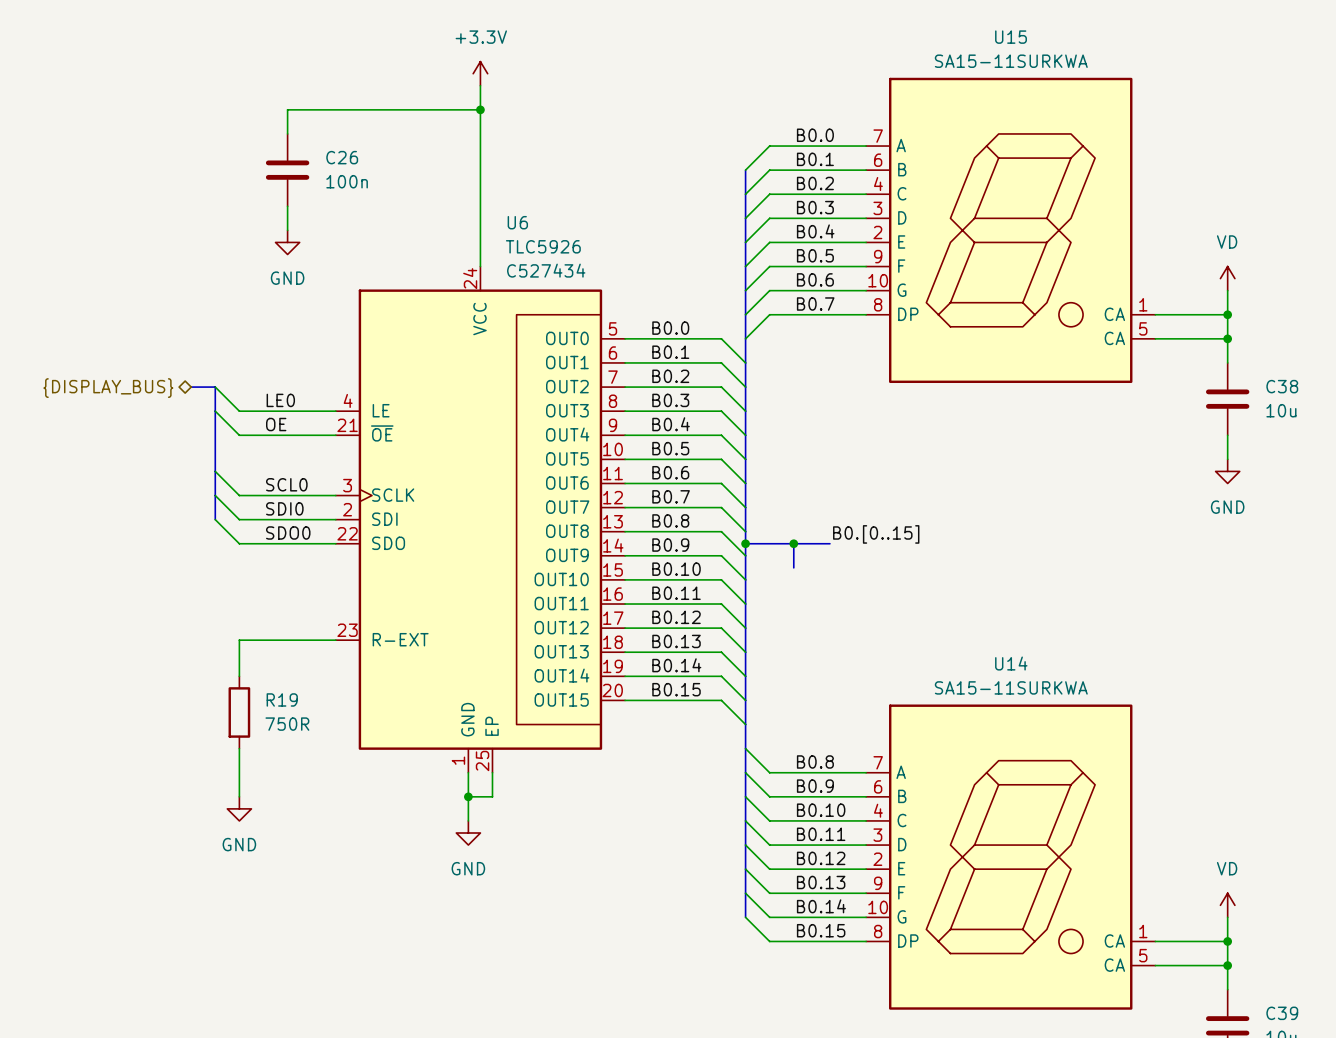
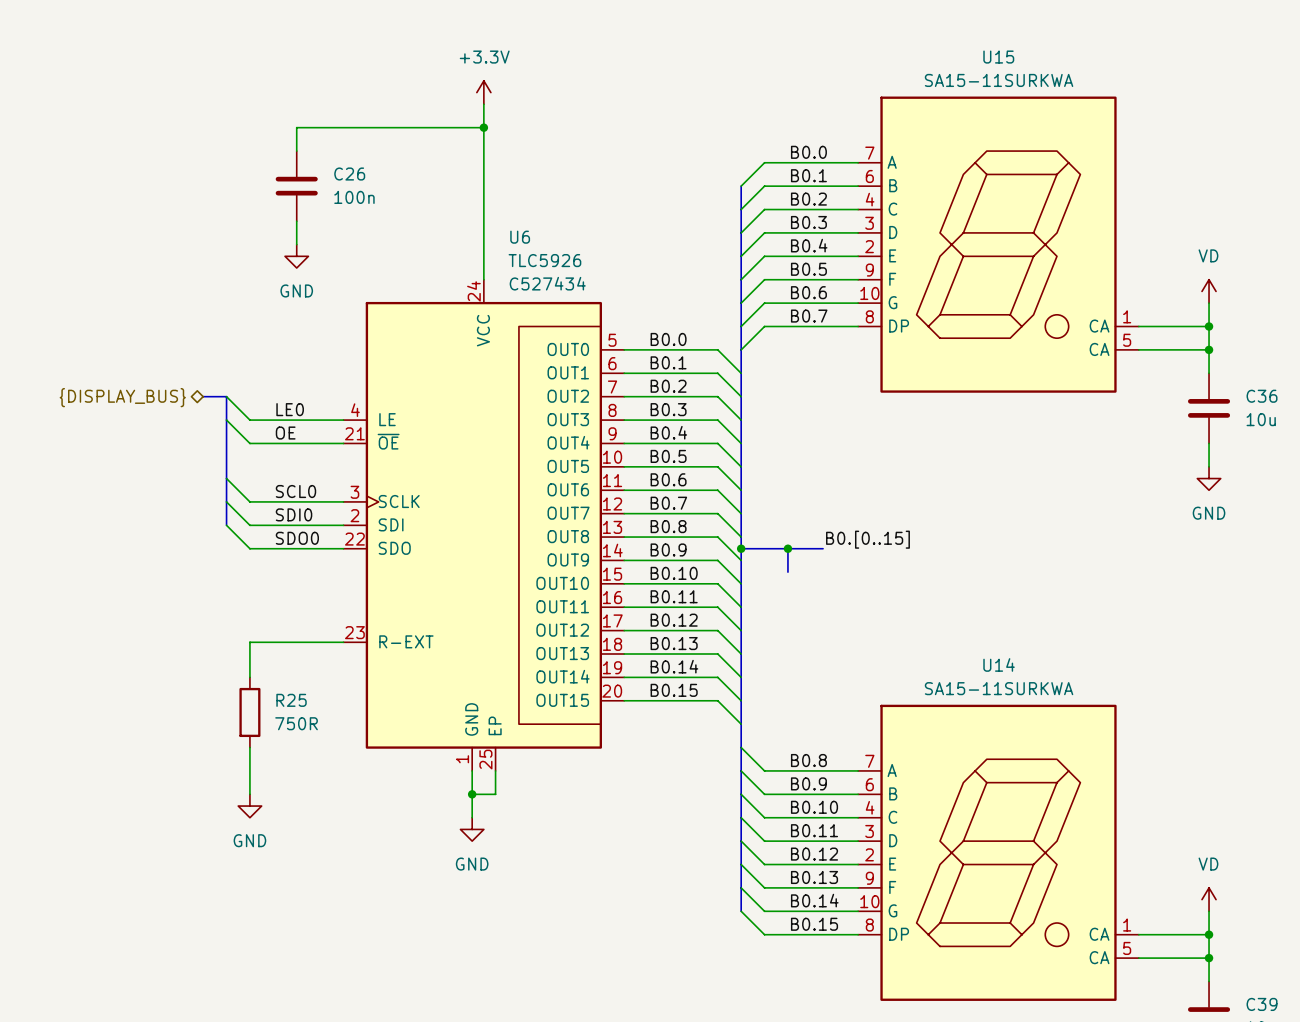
C38 name: C38 (1282, 386) -> C36 (1262, 396)
R19 name: R19 (282, 699) -> R25 (291, 700)

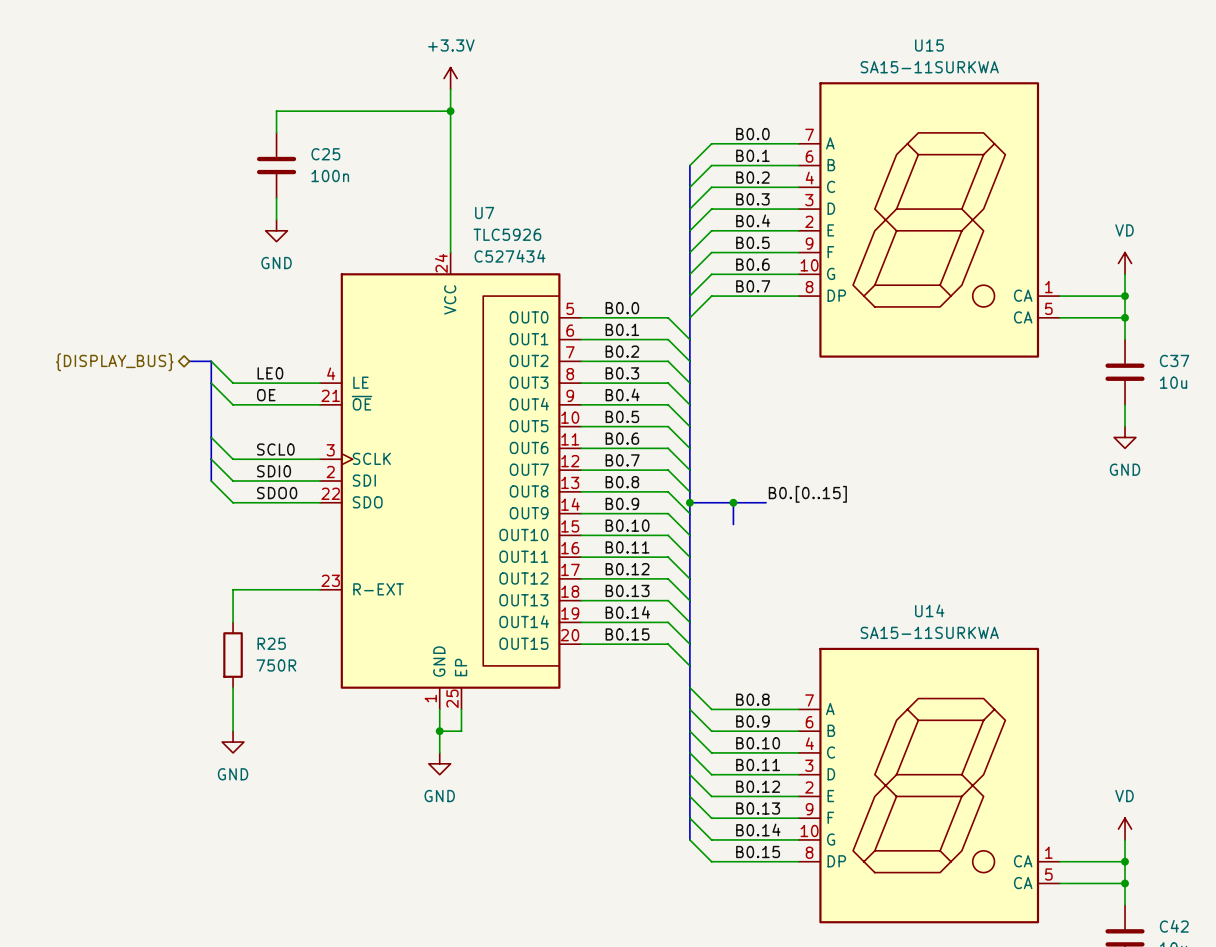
C26 name: C26 (349, 174) -> C25 (325, 154)
U6 name: U6 (520, 237) -> U7 (484, 213)
C36 name: C36 (1262, 396) -> C37 (1174, 360)
C39 name: C39 (1262, 1004) -> C42 (1174, 926)

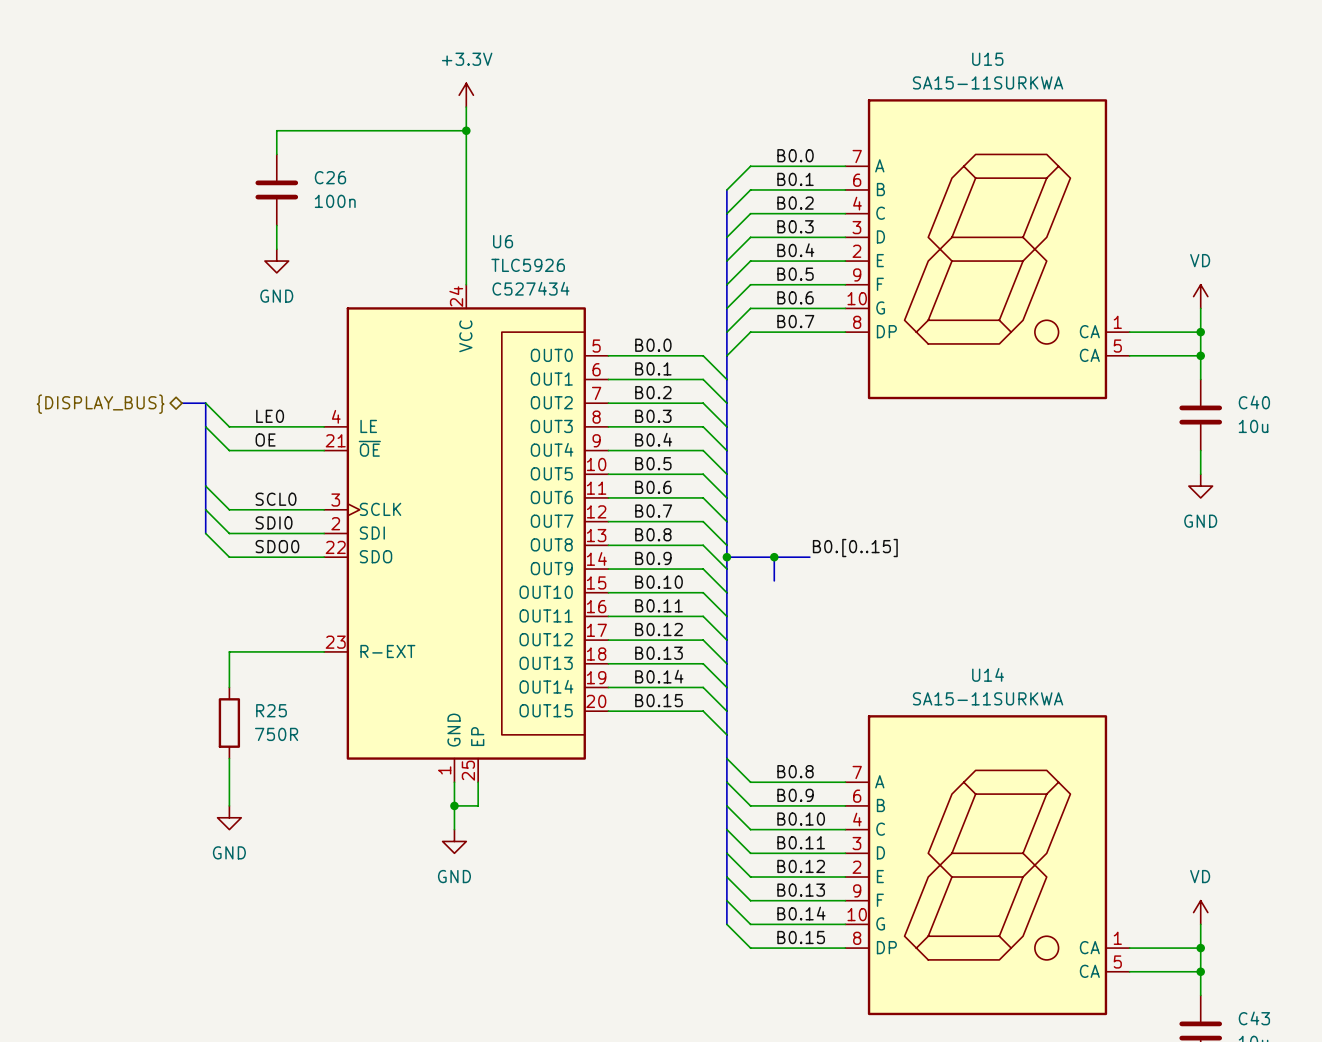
C25 name: C25 (325, 154) -> C26 (330, 177)
U7 name: U7 (484, 213) -> U6 (503, 241)
C37 name: C37 (1174, 360) -> C40 (1254, 402)
C42 name: C42 (1174, 926) -> C43 (1254, 1018)

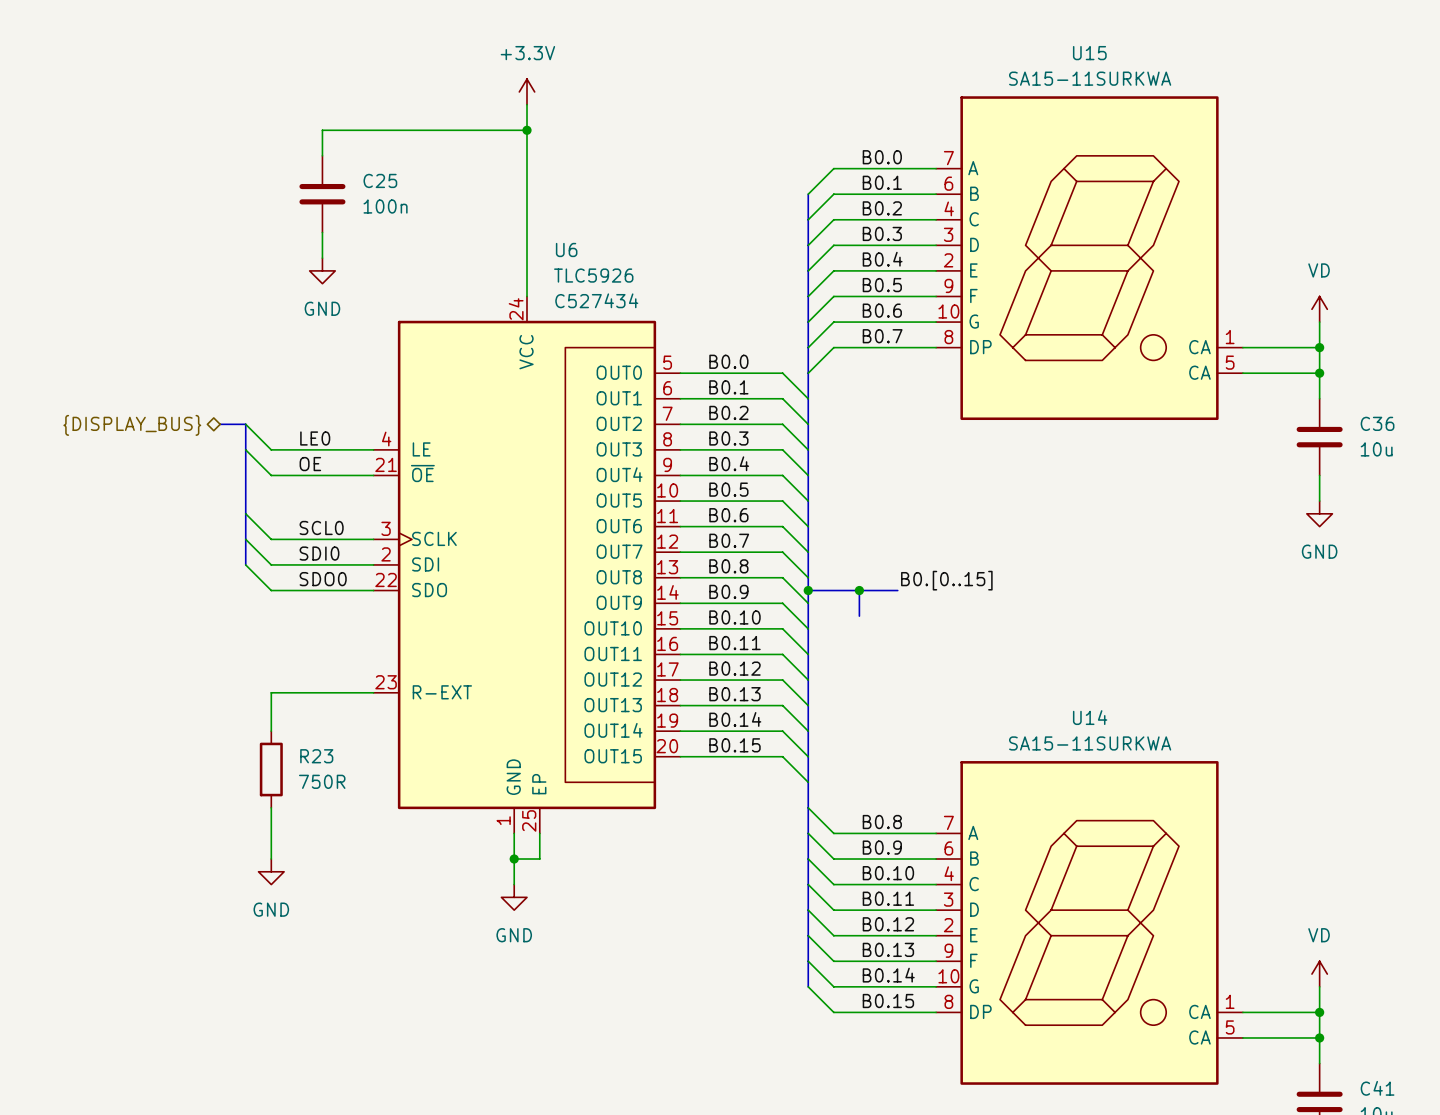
C26 name: C26 (330, 177) -> C25 (380, 180)
C40 name: C40 (1254, 402) -> C36 (1377, 423)
R25 name: R25 (271, 710) -> R23 (316, 756)
C43 name: C43 (1254, 1018) -> C41 (1377, 1088)

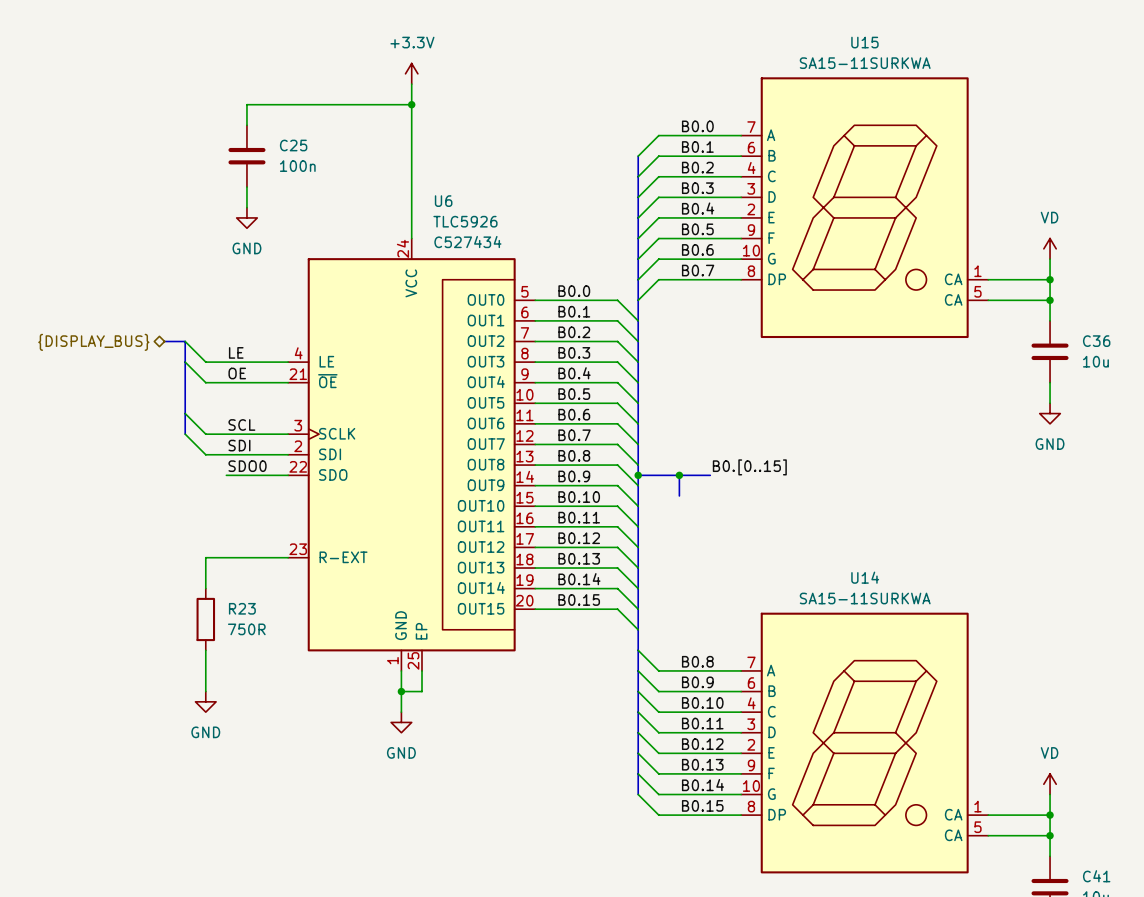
label: LE0 (315, 438) -> LE (236, 352)
label: SCL0 (321, 527) -> SCL (241, 424)
bus: (245, 539) (245, 564) -> none
label: SDI0 (319, 553) -> SDI (239, 445)
wire: (245, 564) (271, 590) (296, 590) -> none

